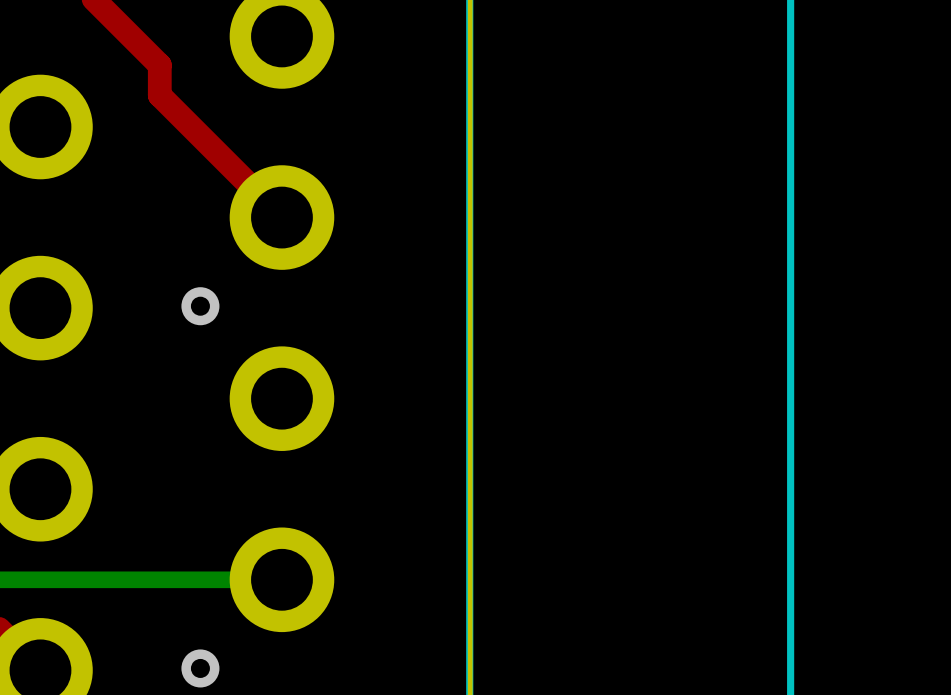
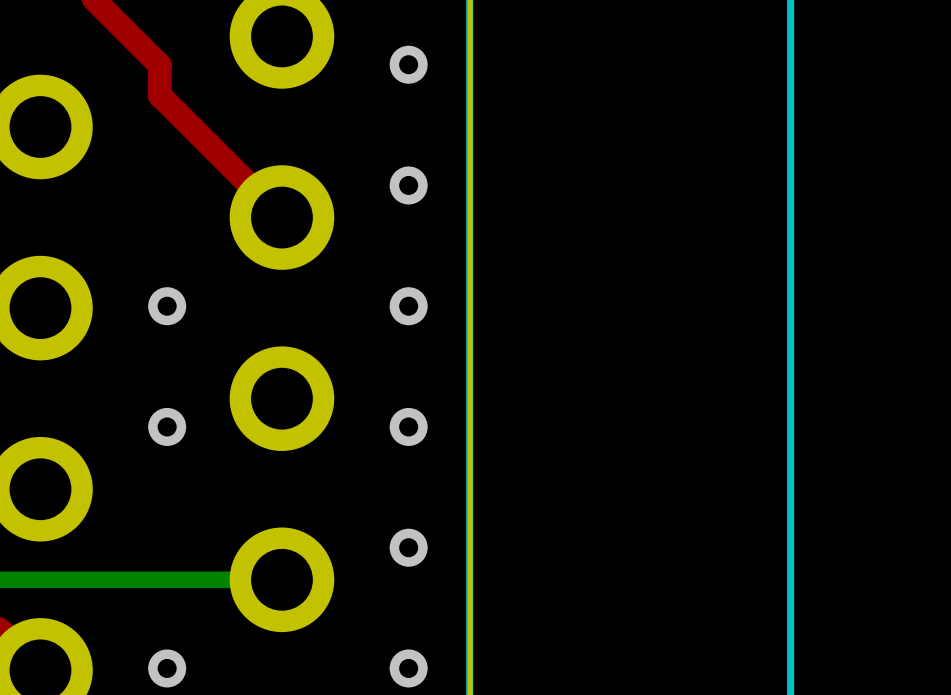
via: none -> (408, 64)
via: none -> (408, 185)
via position: (200, 306) -> (167, 306)
via: none -> (408, 306)
via: none -> (167, 426)
via: none -> (408, 426)
via: none -> (408, 547)
via position: (200, 668) -> (167, 668)
via: none -> (408, 668)

